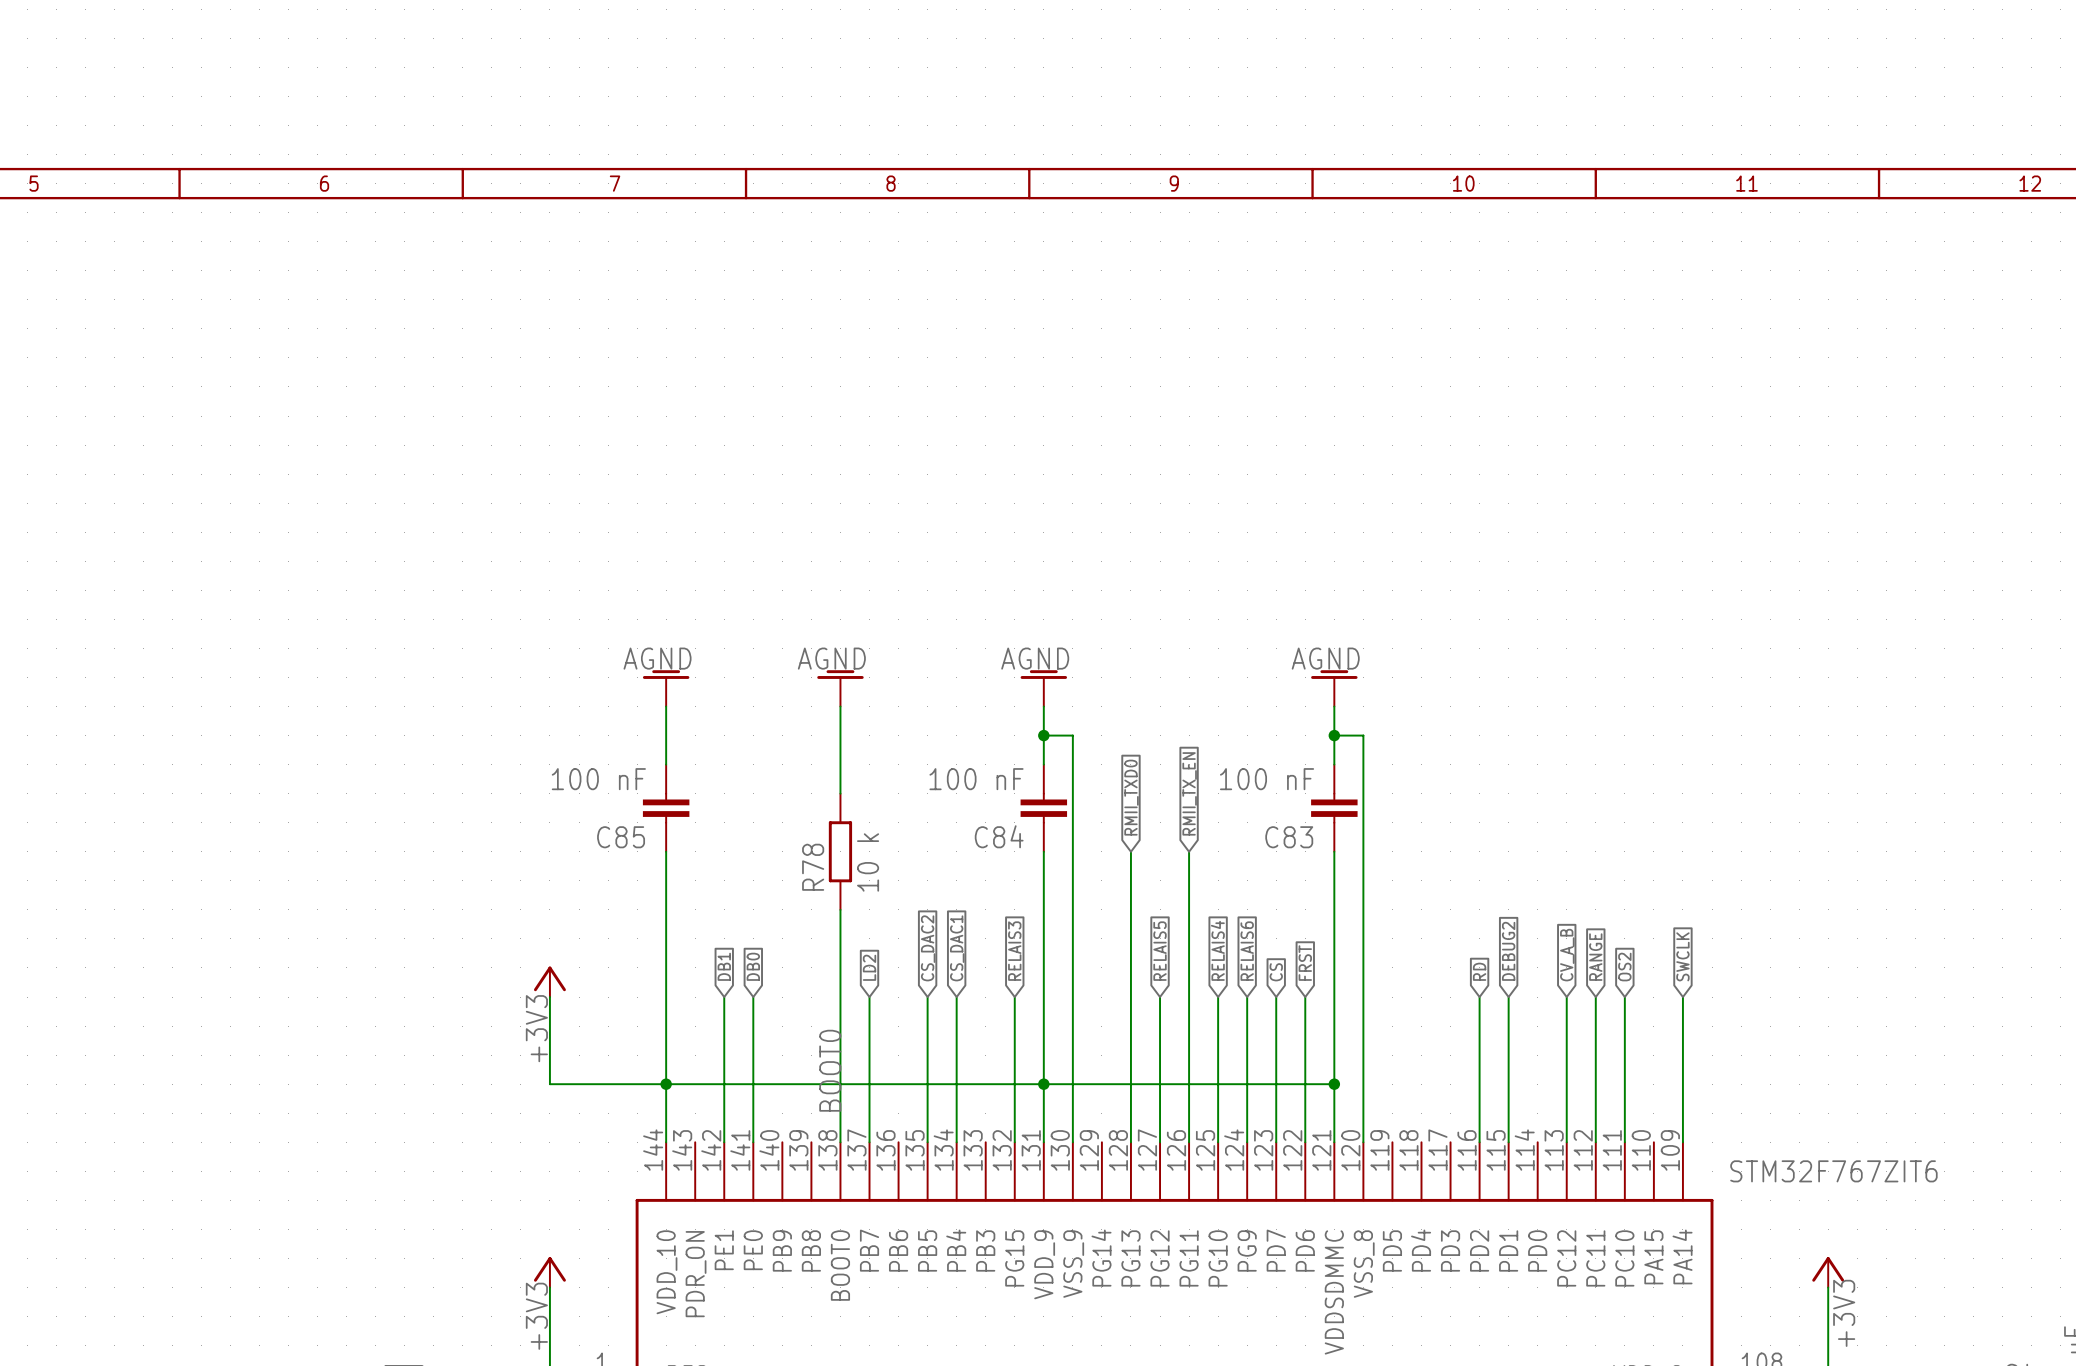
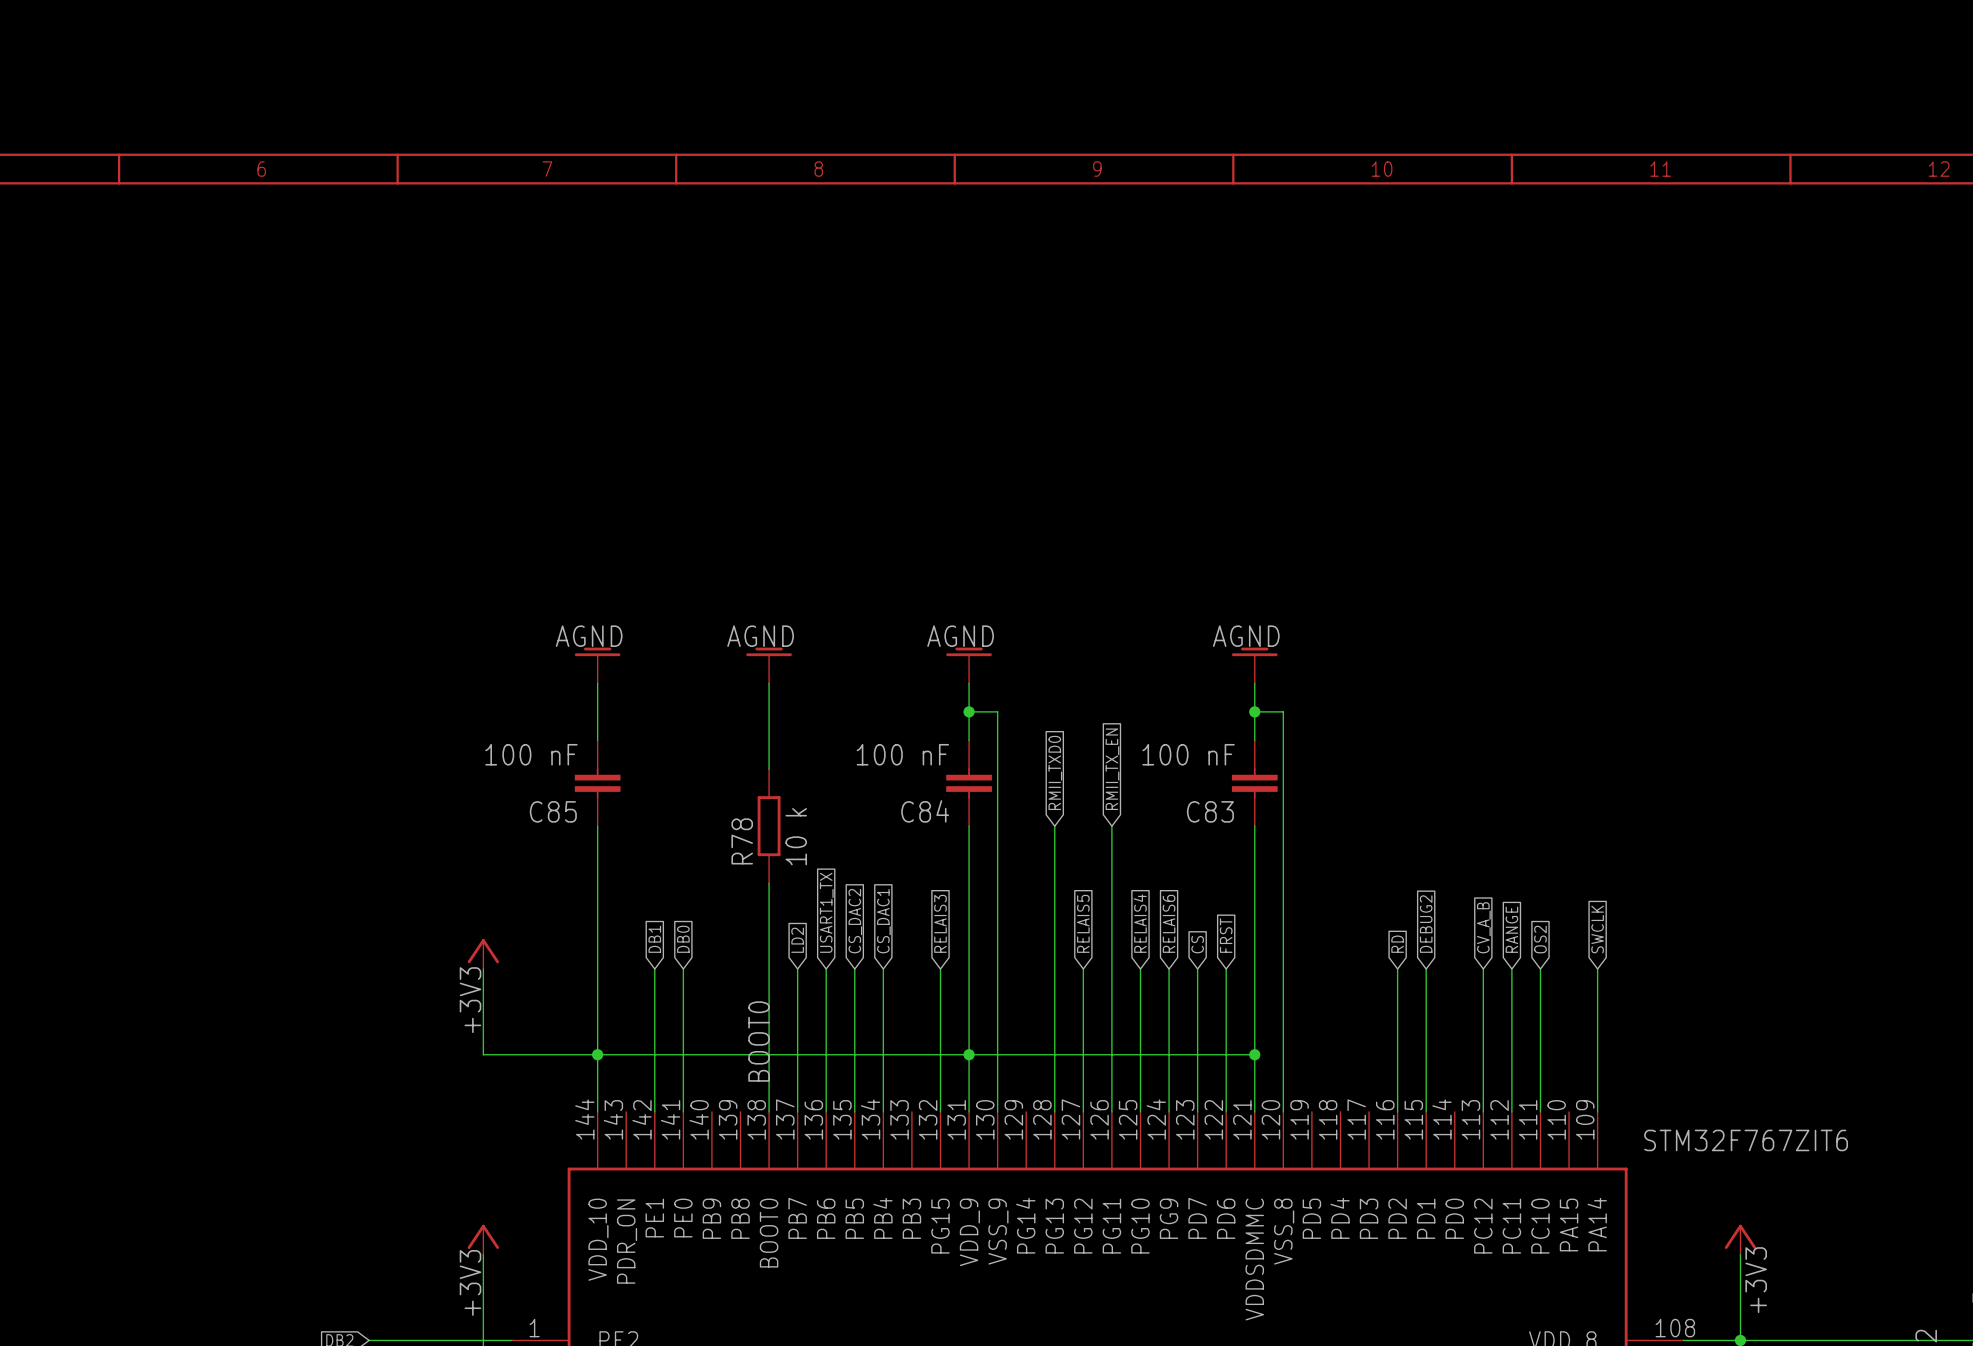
global label: none -> USART1_TX (826, 912)
wire: none -> (826, 969) (826, 1111)

